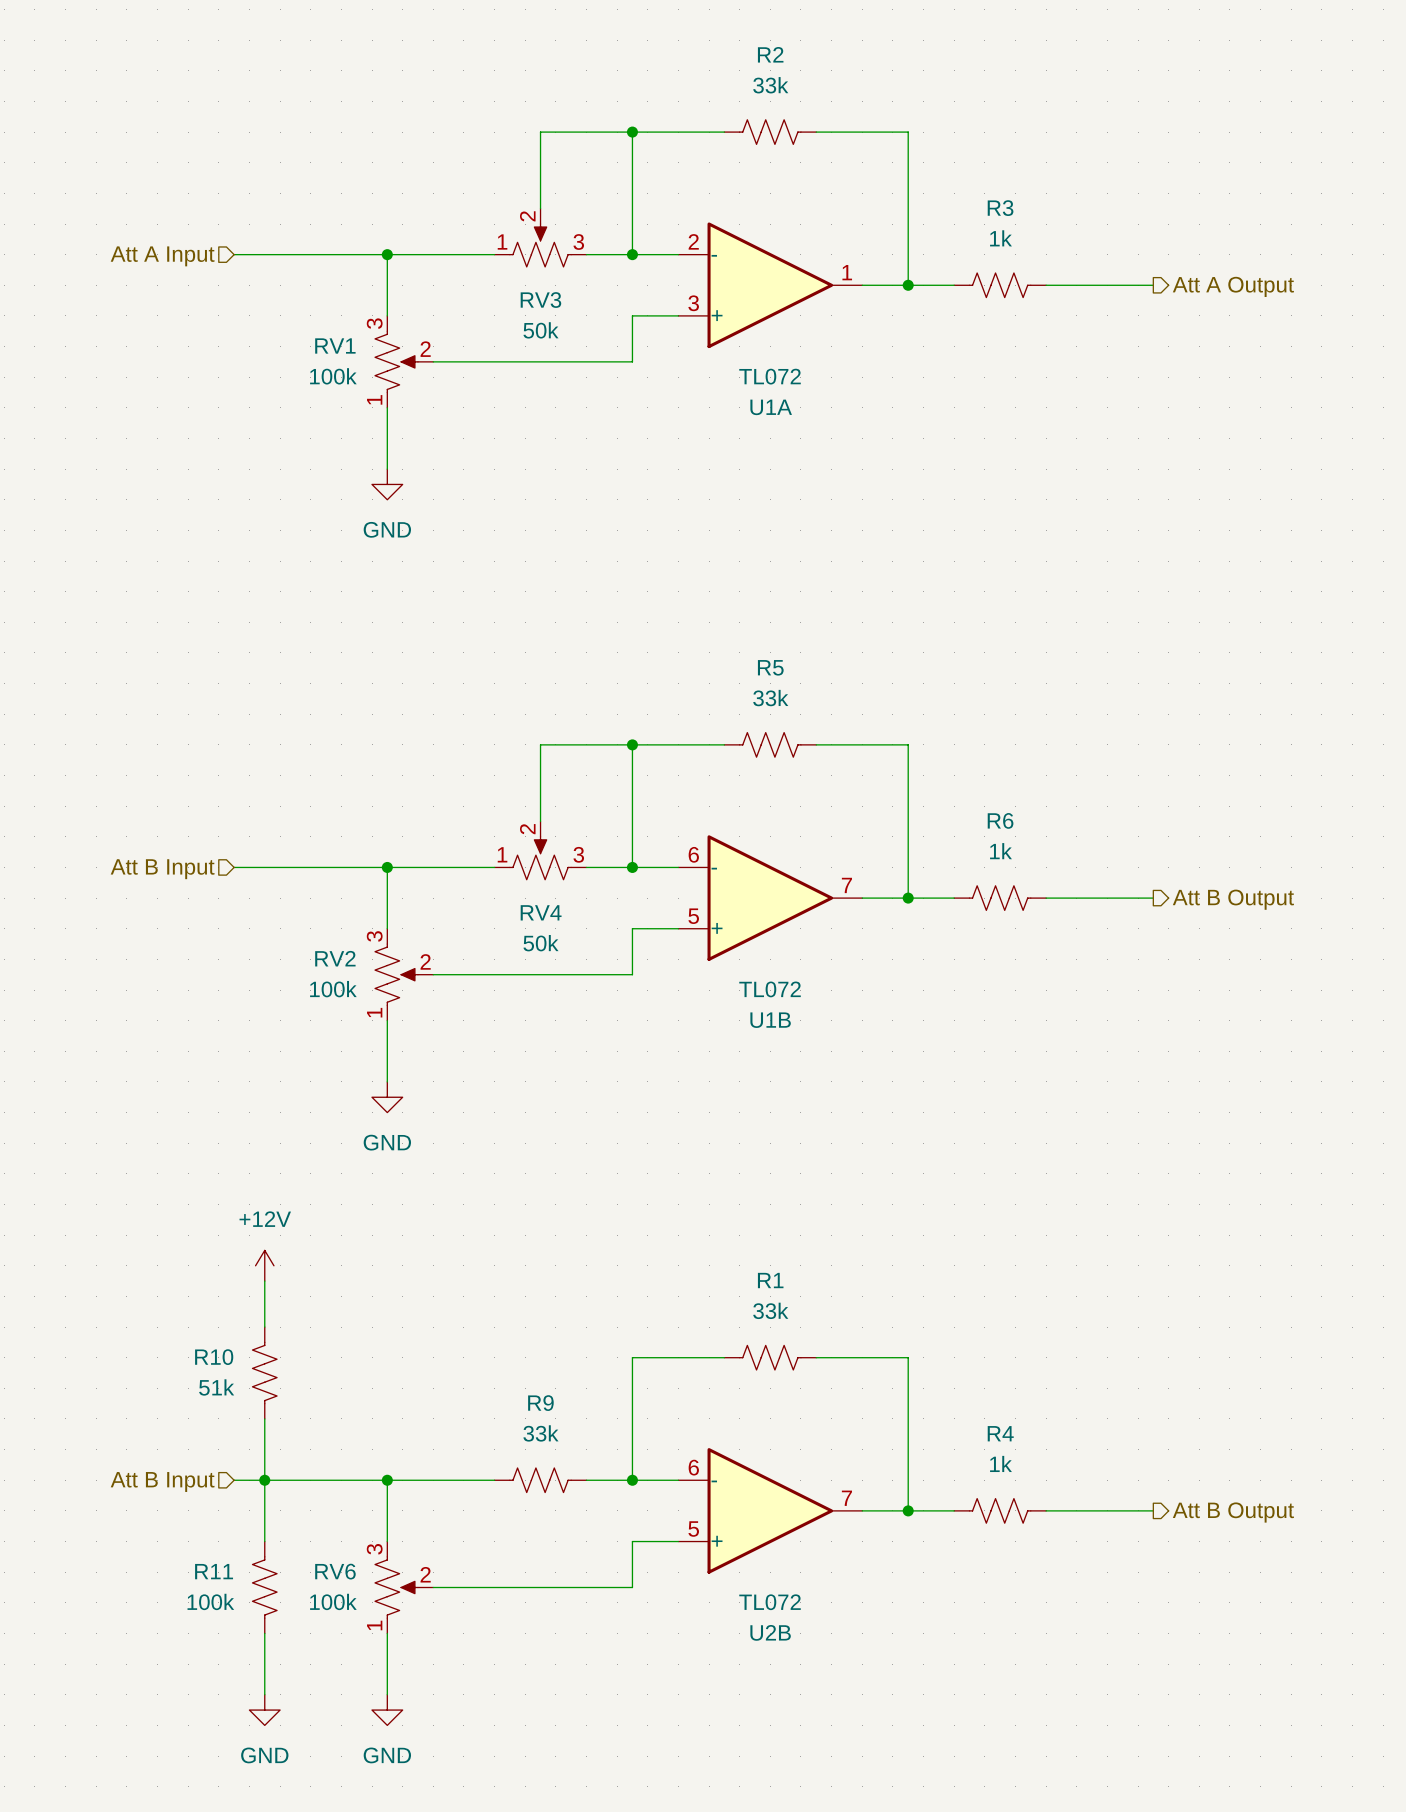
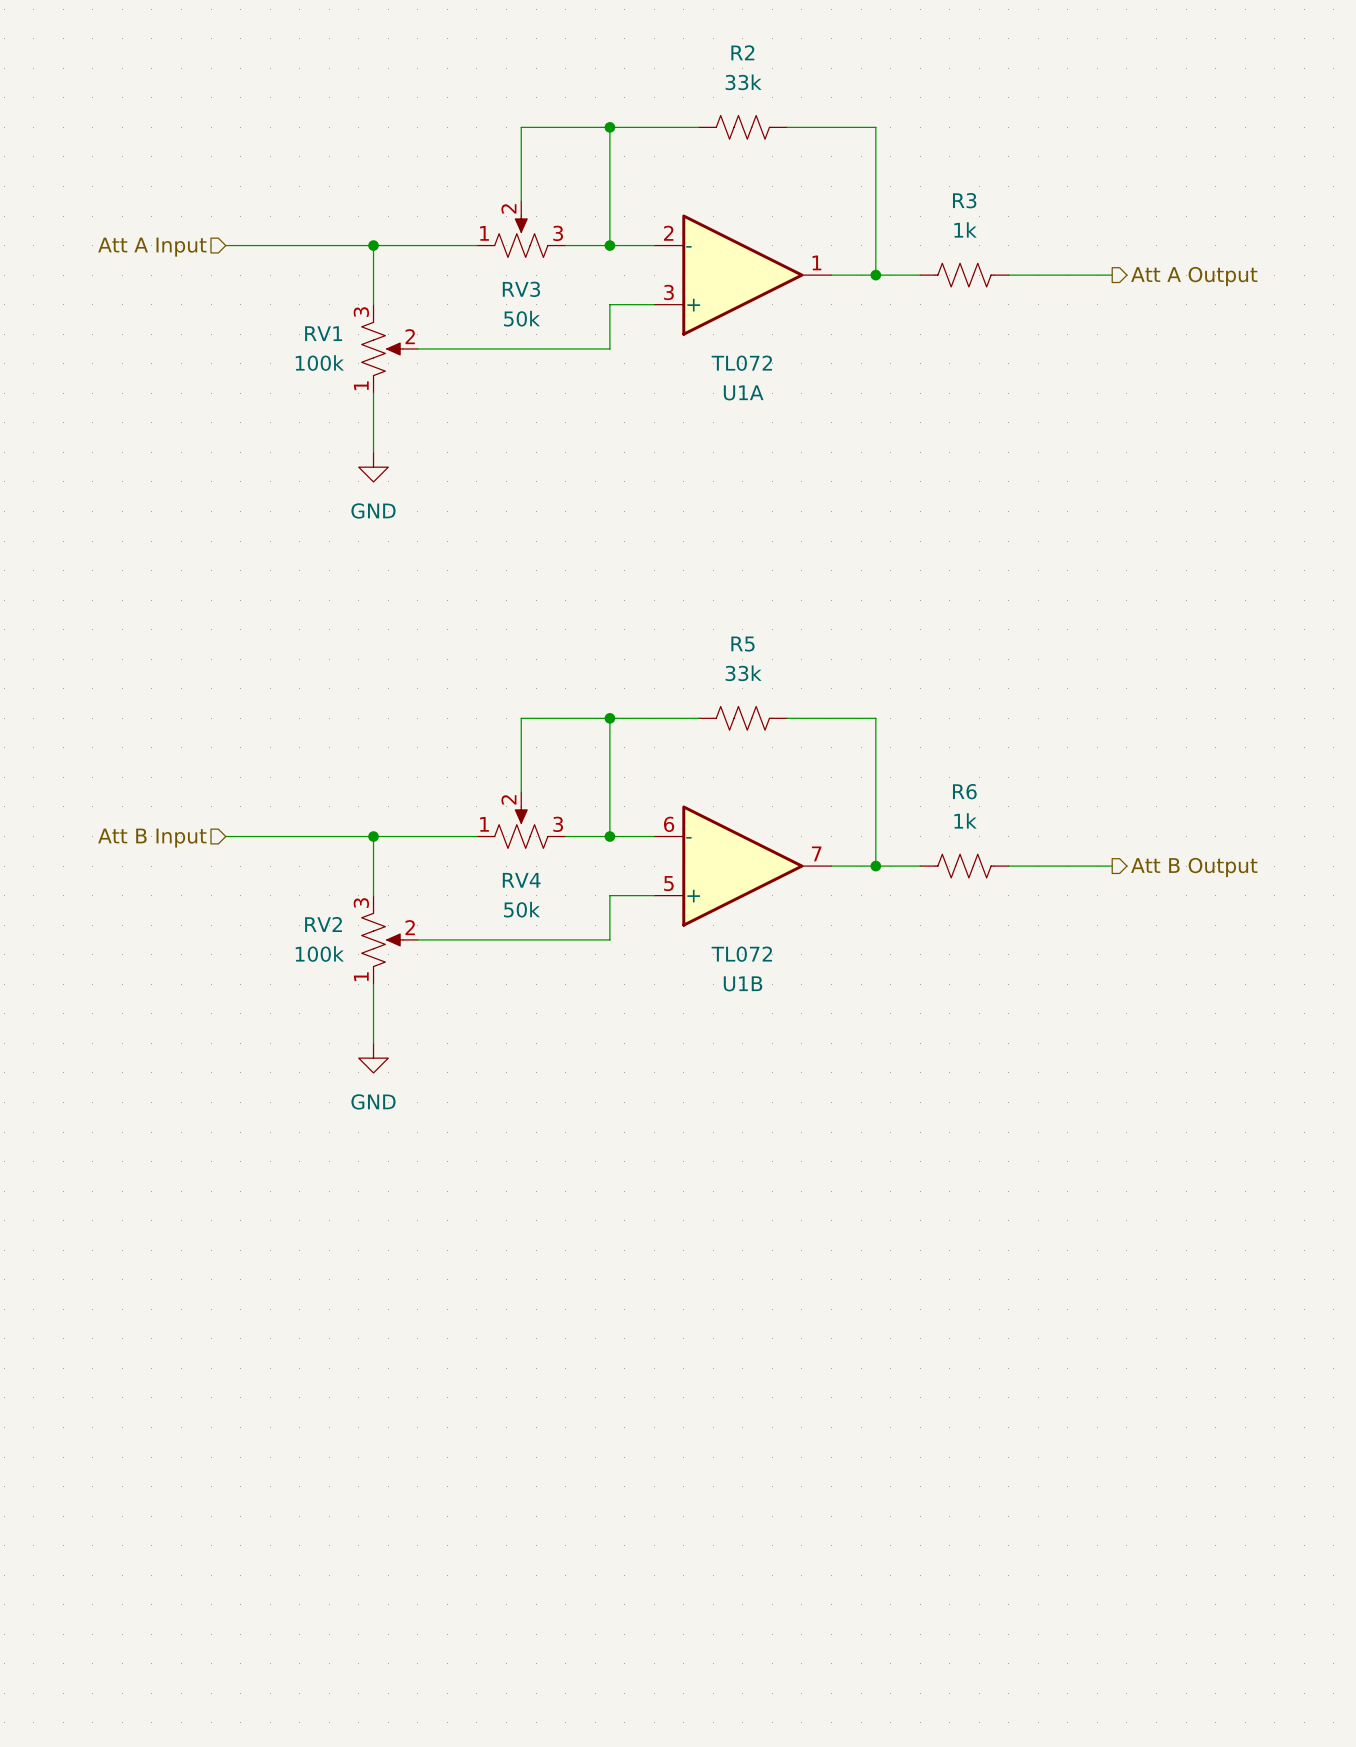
power symbol: +12V (264, 1265) -> none
wire: (264, 1281) (264, 1327) -> none
wire: (724, 1357) (632, 1357) (632, 1480) -> none
R1: 33k (770, 1357) -> none
wire: (816, 1357) (908, 1357) (908, 1510) -> none
R10: 51k (264, 1373) -> none
wire: (264, 1418) (264, 1541) -> none
wire: (234, 1480) (494, 1480) -> none
junction: (264, 1480) -> none
wire: (387, 1480) (387, 1541) -> none
junction: (387, 1480) -> none
R9: 33k (540, 1480) -> none
wire: (586, 1480) (678, 1480) -> none
junction: (632, 1480) -> none
hierarchical label: Att B Input (162, 1482) -> none
U2B: TL072 (770, 1510) -> none
wire: (862, 1510) (954, 1510) -> none
junction: (908, 1510) -> none
R4: 1k (1000, 1510) -> none
wire: (1046, 1510) (1153, 1510) -> none
hierarchical label: Att B Output (1233, 1512) -> none
wire: (678, 1541) (632, 1541) (632, 1587) (433, 1587) -> none
R11: 100k (264, 1587) -> none
RV6: 100k (404, 1587) -> none
wire: (264, 1633) (264, 1694) -> none
wire: (387, 1633) (387, 1694) -> none
power symbol: GND (264, 1710) -> none
power symbol: GND (387, 1710) -> none

